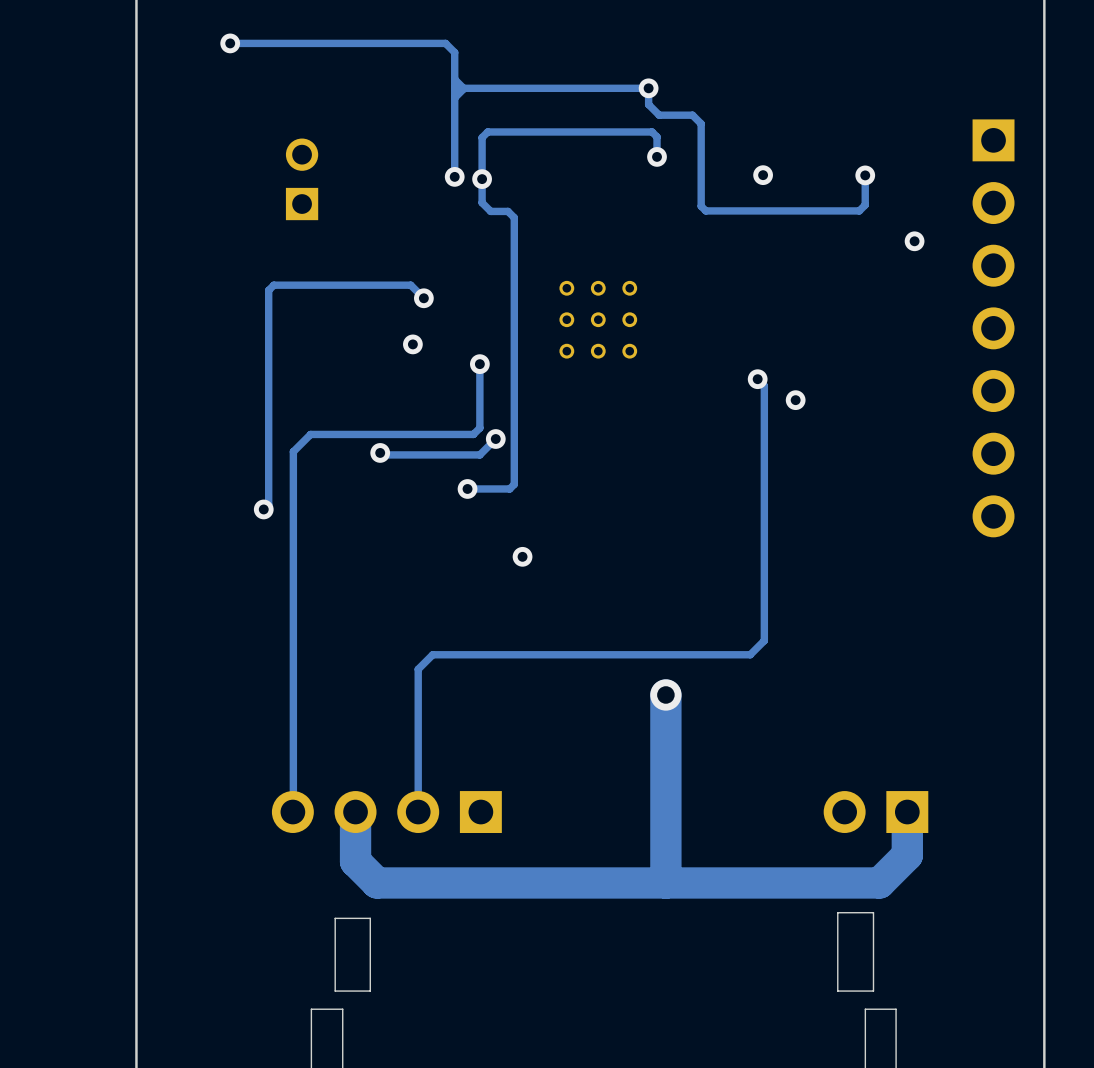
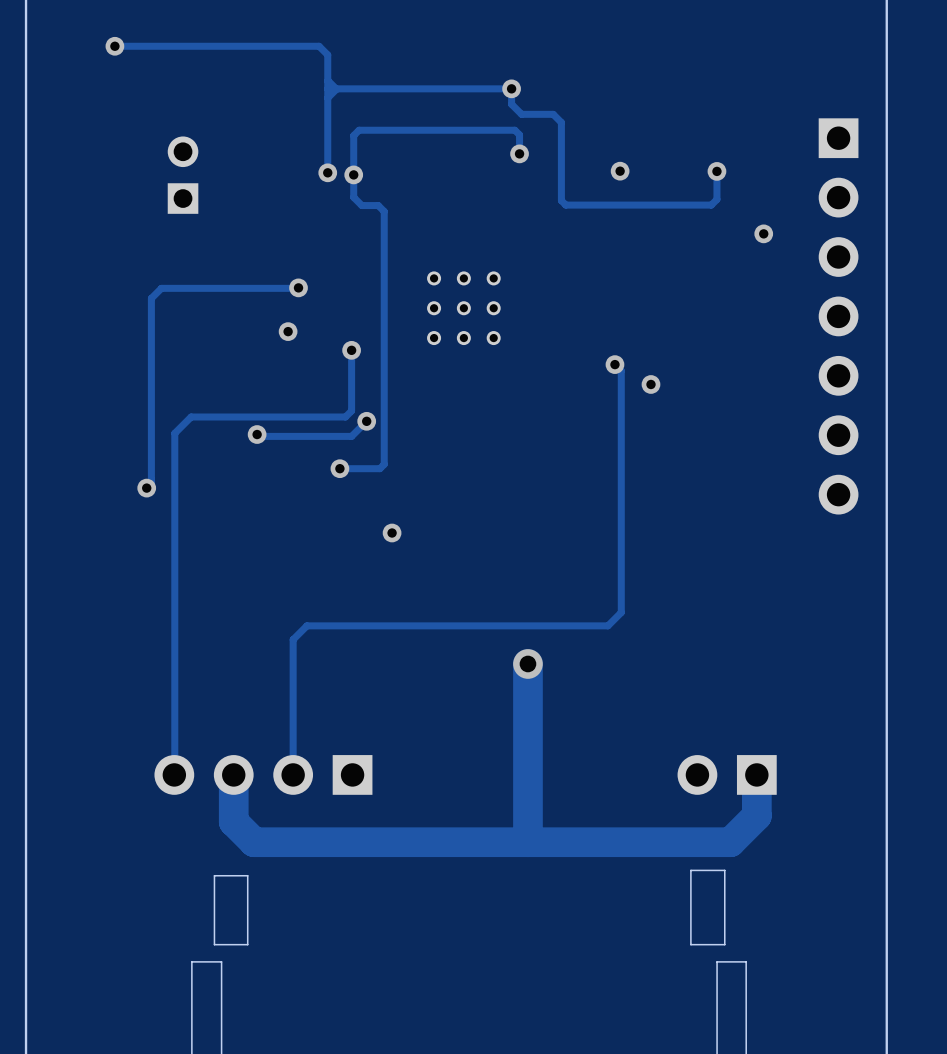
track: (423, 298) (410, 285) (273, 285) (268, 290) (268, 309) -> (298, 287) (161, 288) (151, 298)

